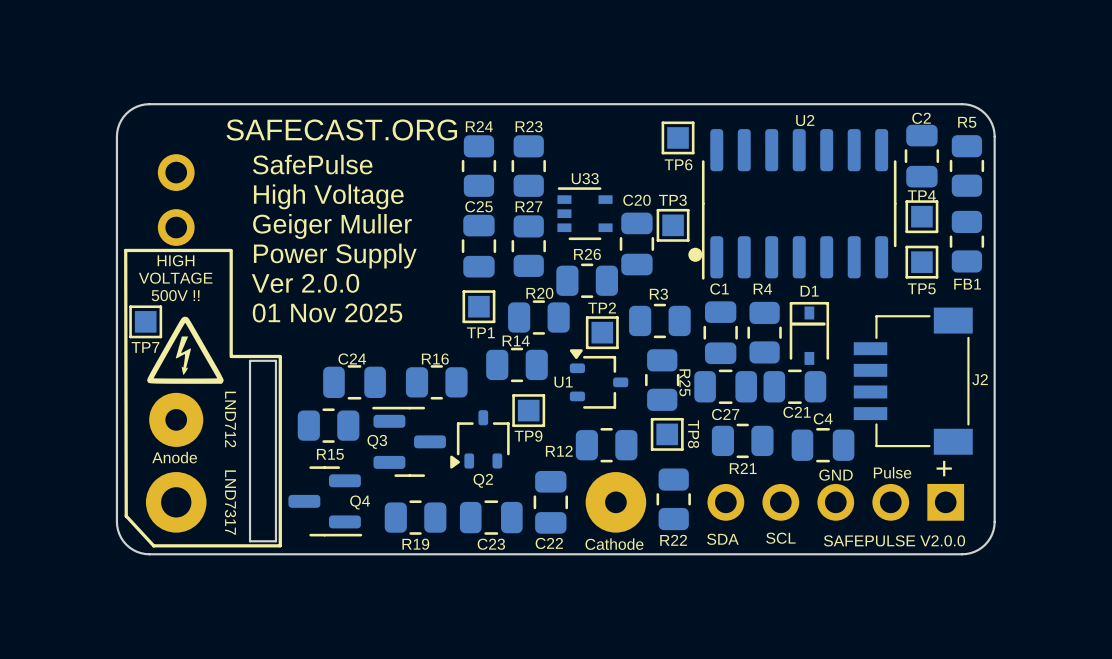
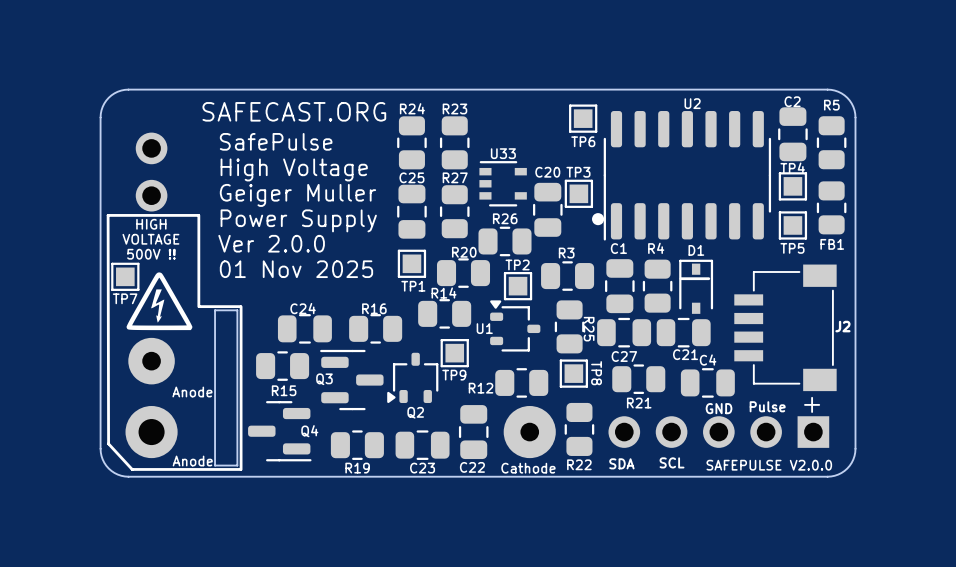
part value: LND712 (230, 419) -> Anode (192, 391)
text: Anode (174, 457) -> none
part value: LND7317 (230, 502) -> Anode (192, 461)

